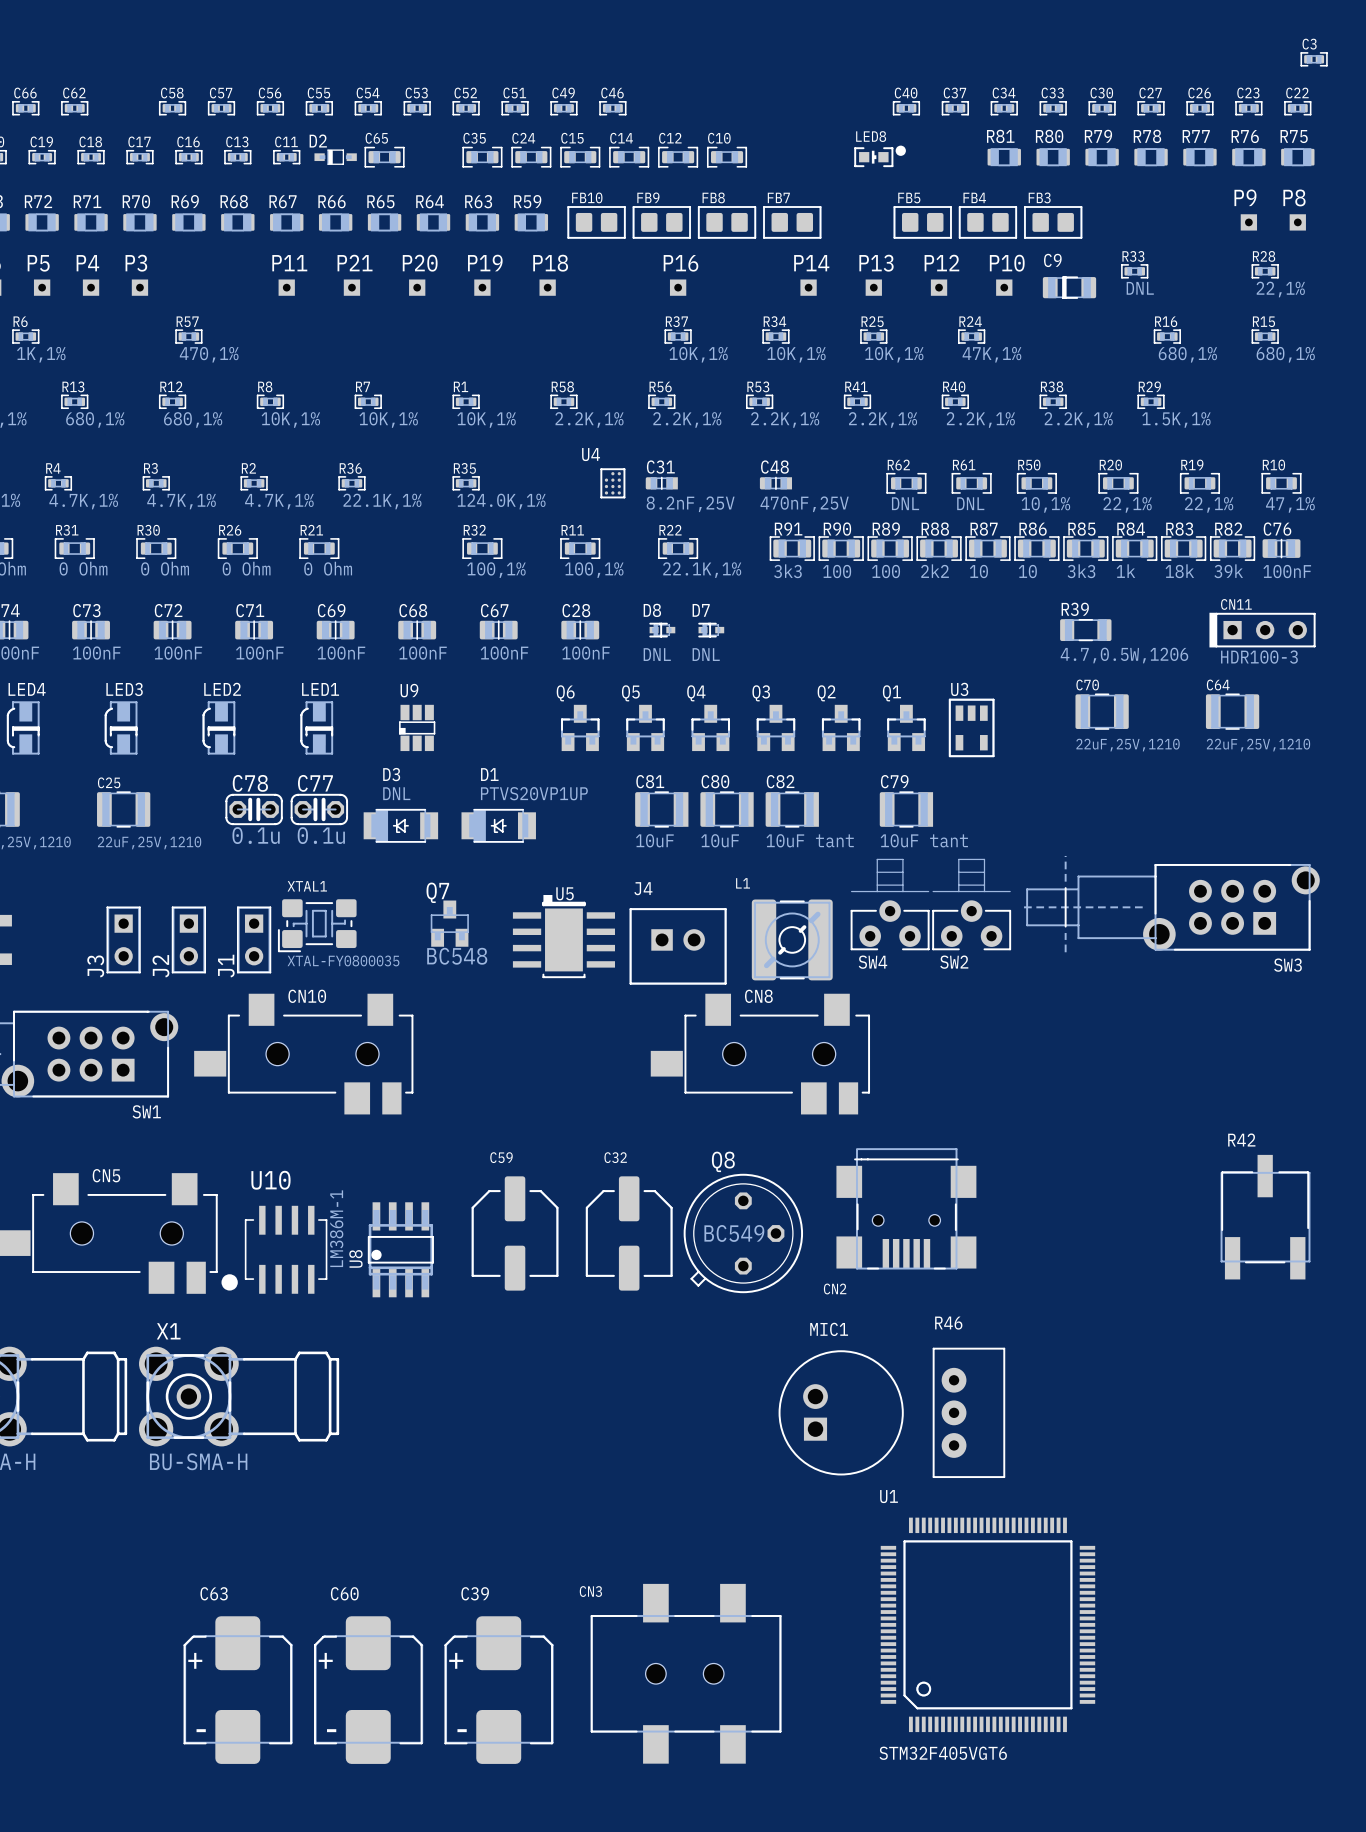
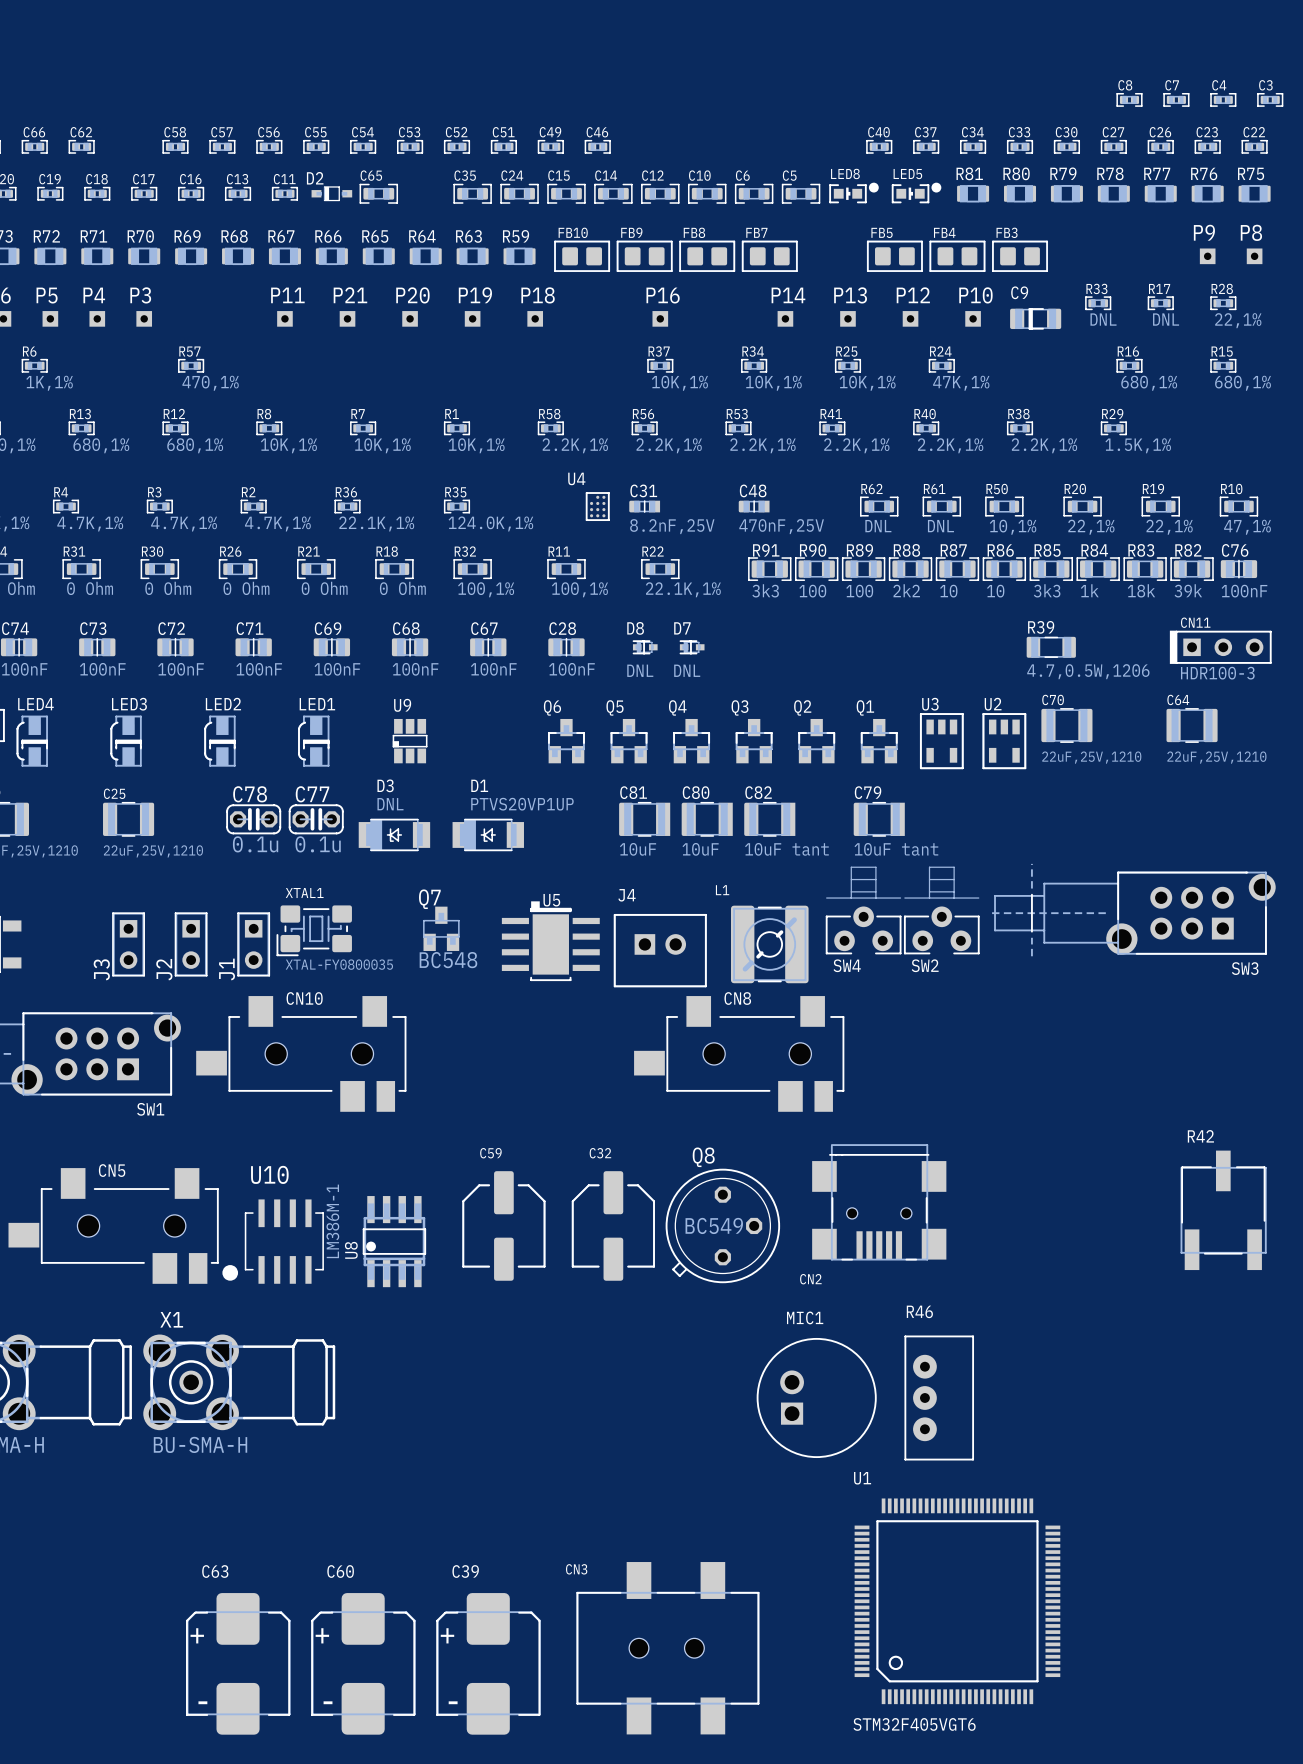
C8: none -> (1129, 99)
C7: none -> (1176, 99)
C4: none -> (1223, 99)
LED5: none -> (916, 192)
C6: none -> (754, 193)
C5: none -> (801, 193)
R17: none -> DNL (1160, 303)
R18: none -> 0 Ohm (394, 569)
U2: none -> (1004, 741)

